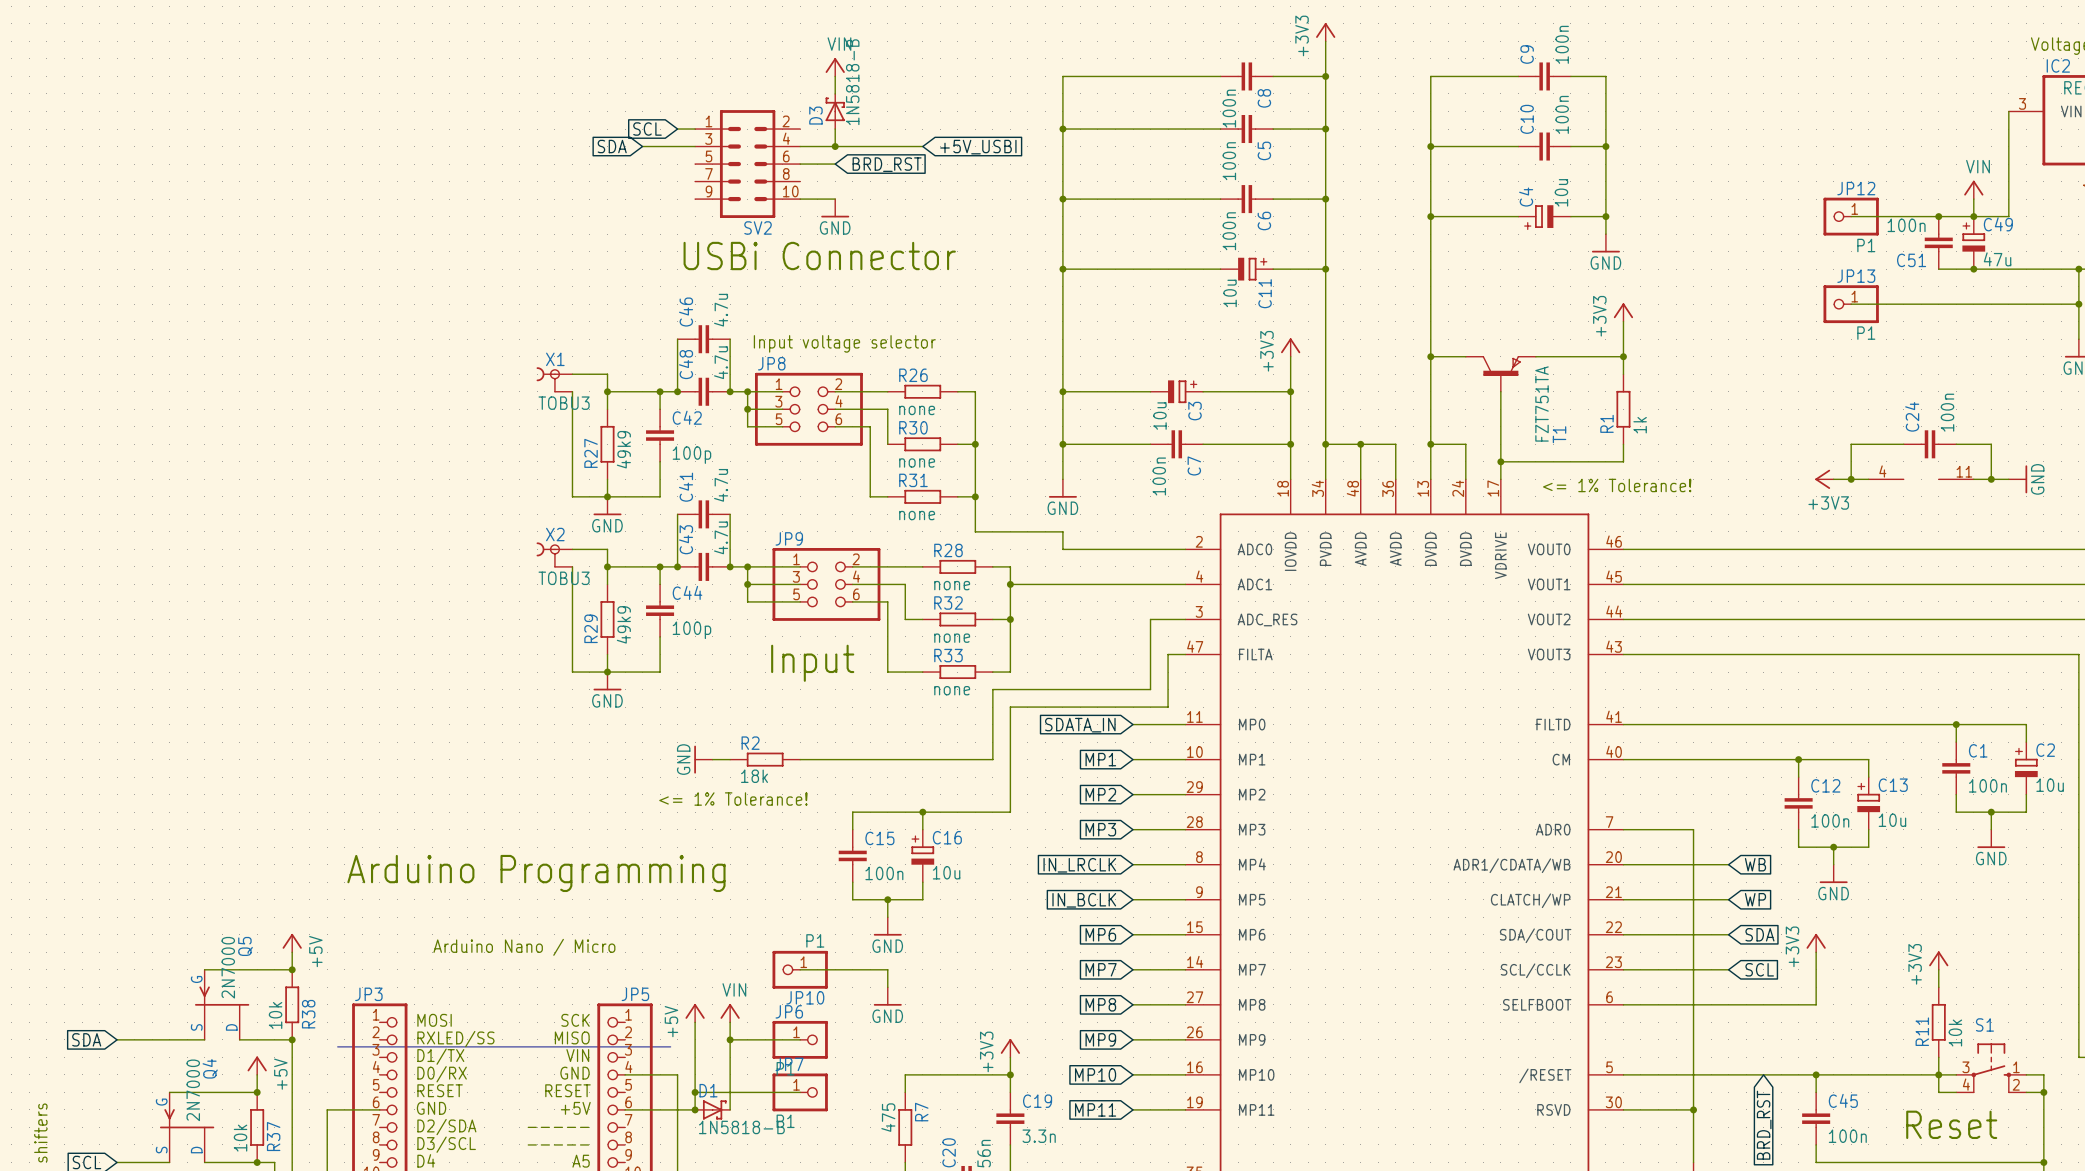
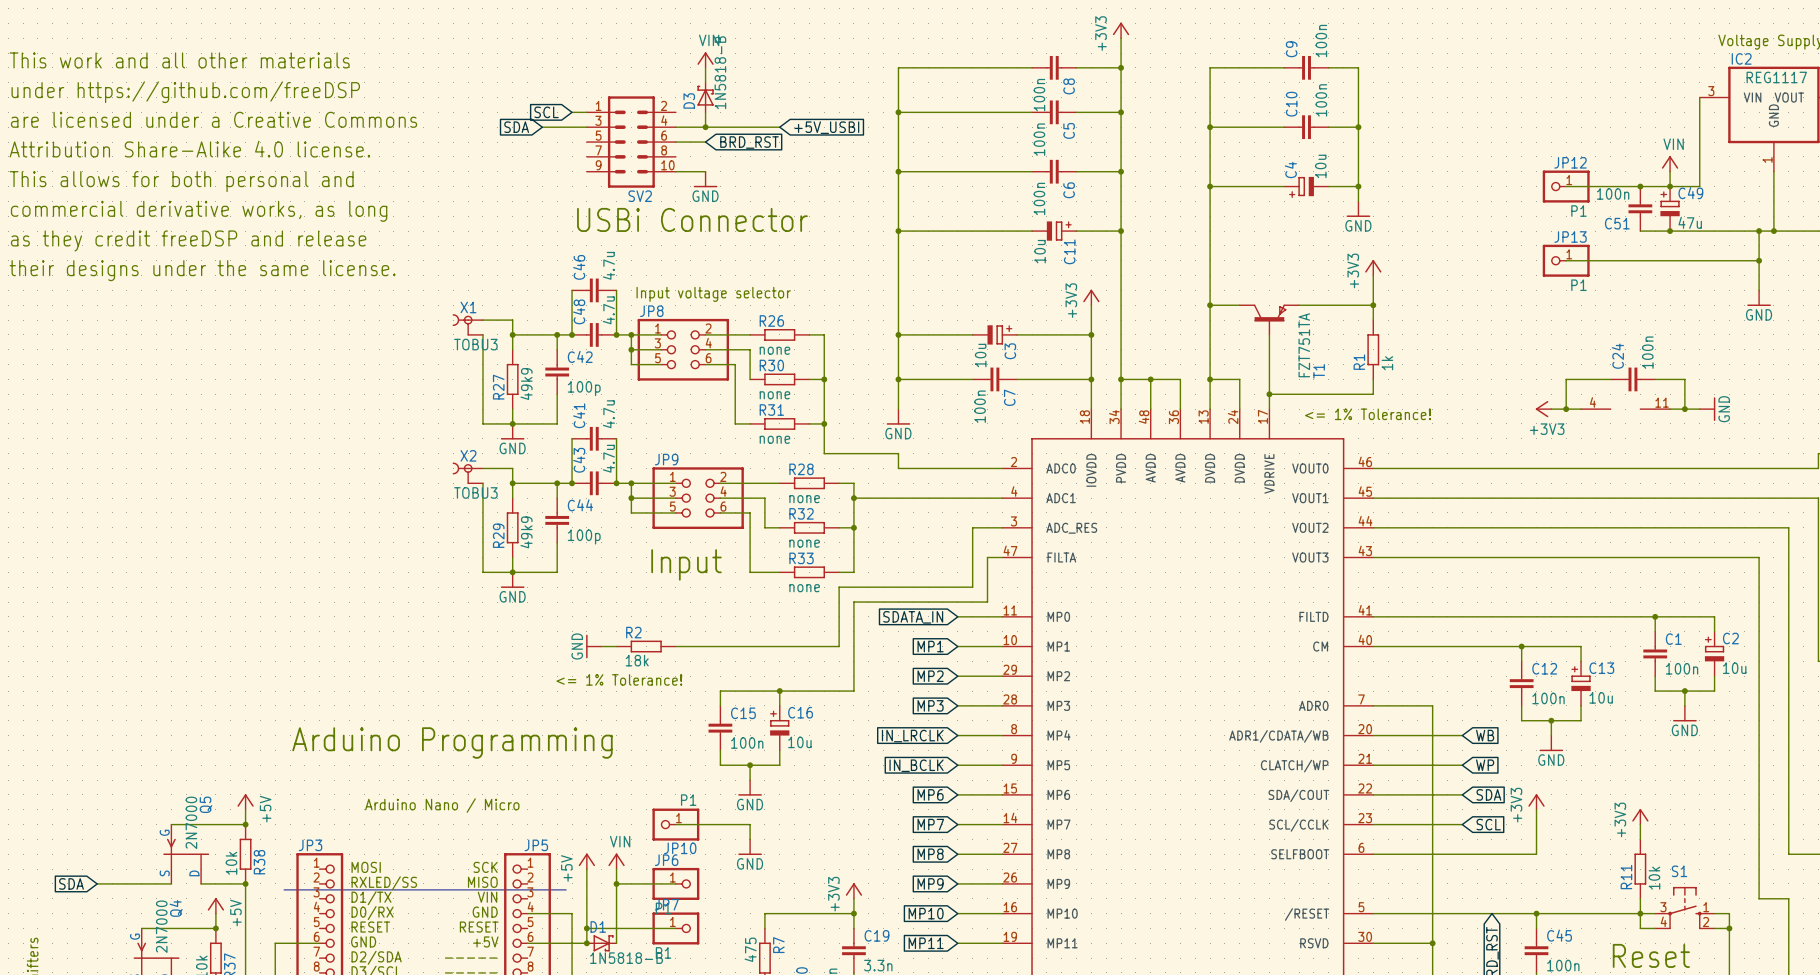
text: none -> This work and all other materials (179, 60)
text: none -> under https://github.com/freeDSP (185, 92)
text: none -> are licensed under a Creative Commons (214, 119)
text: none -> Attribution Share-Alike 4.0 license. (189, 149)
text: none -> This allows for both personal and (181, 181)
text: none -> commercial derivative works, as long (199, 211)
text: none -> as they credit freeDSP and release (188, 240)
text: none -> their designs under the same license. (202, 270)

